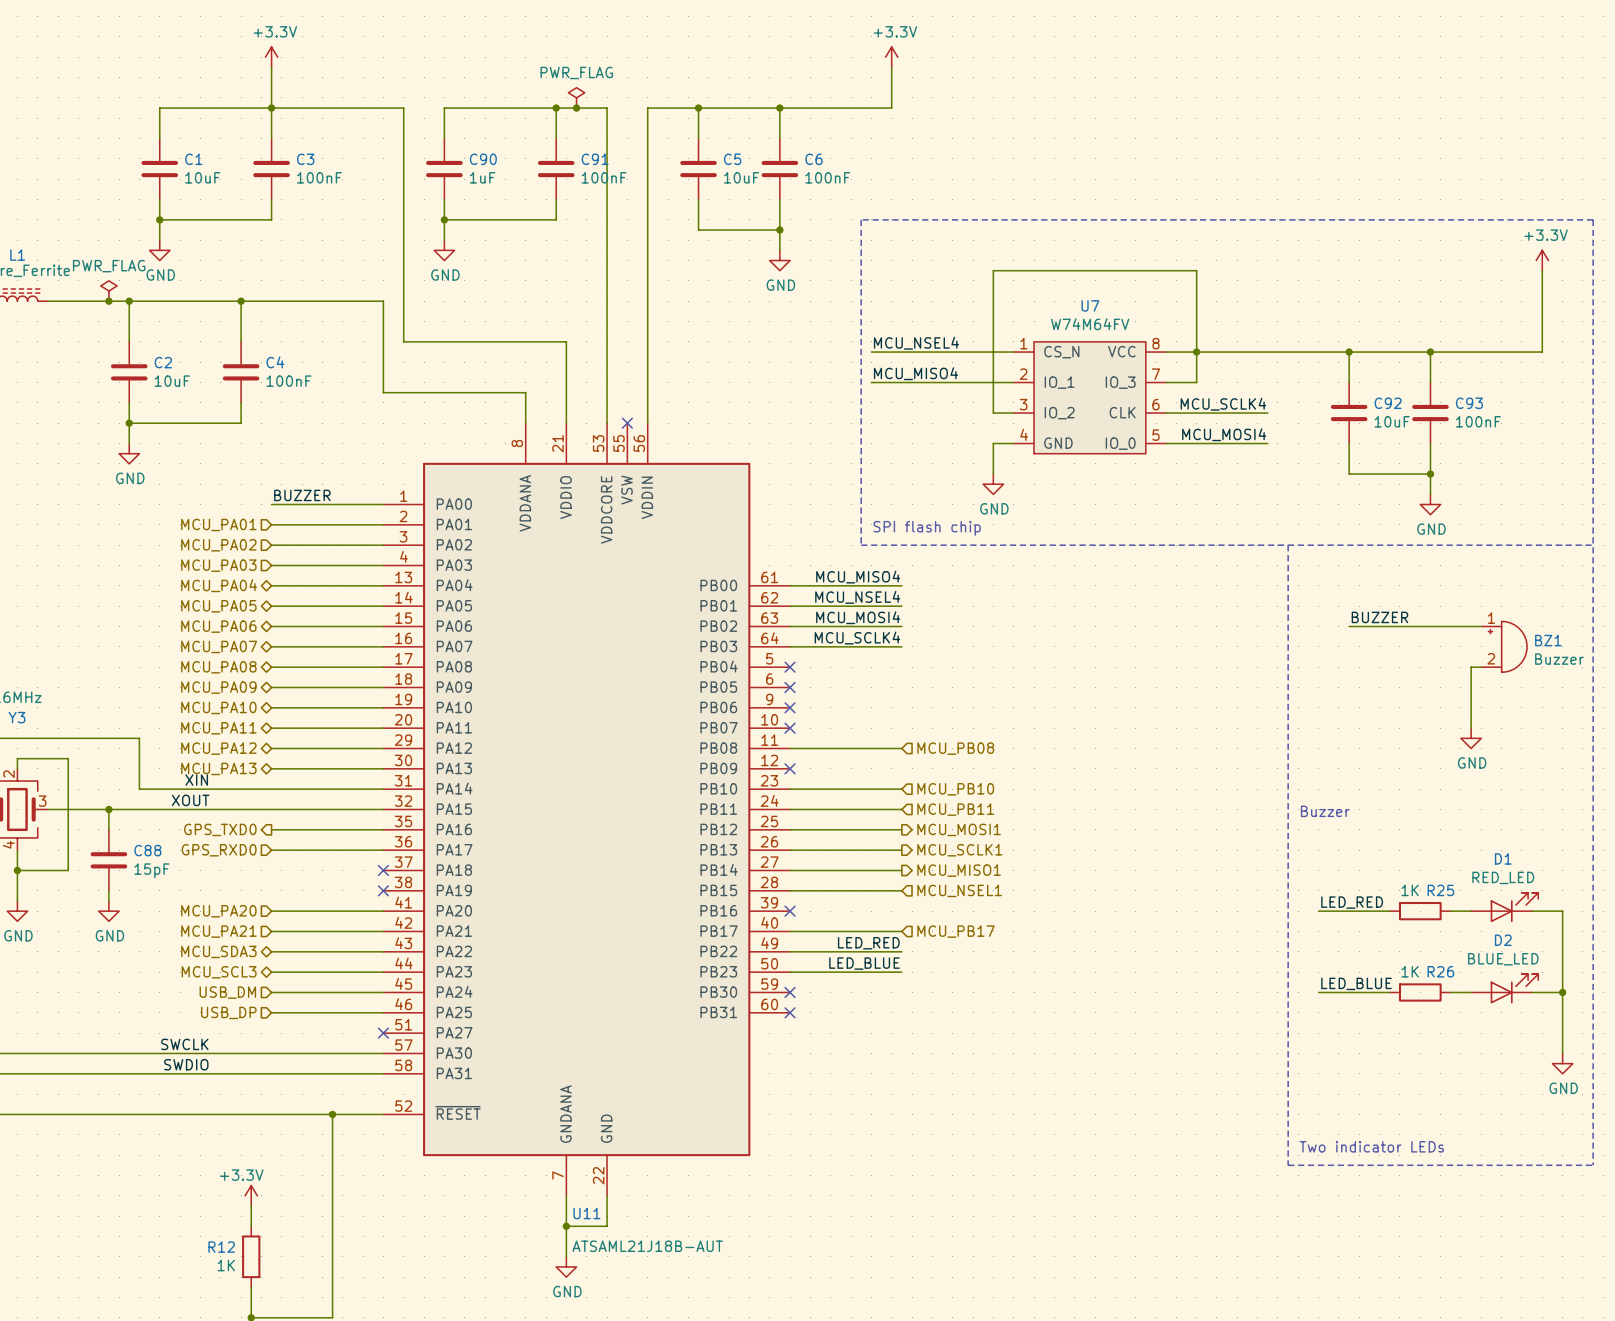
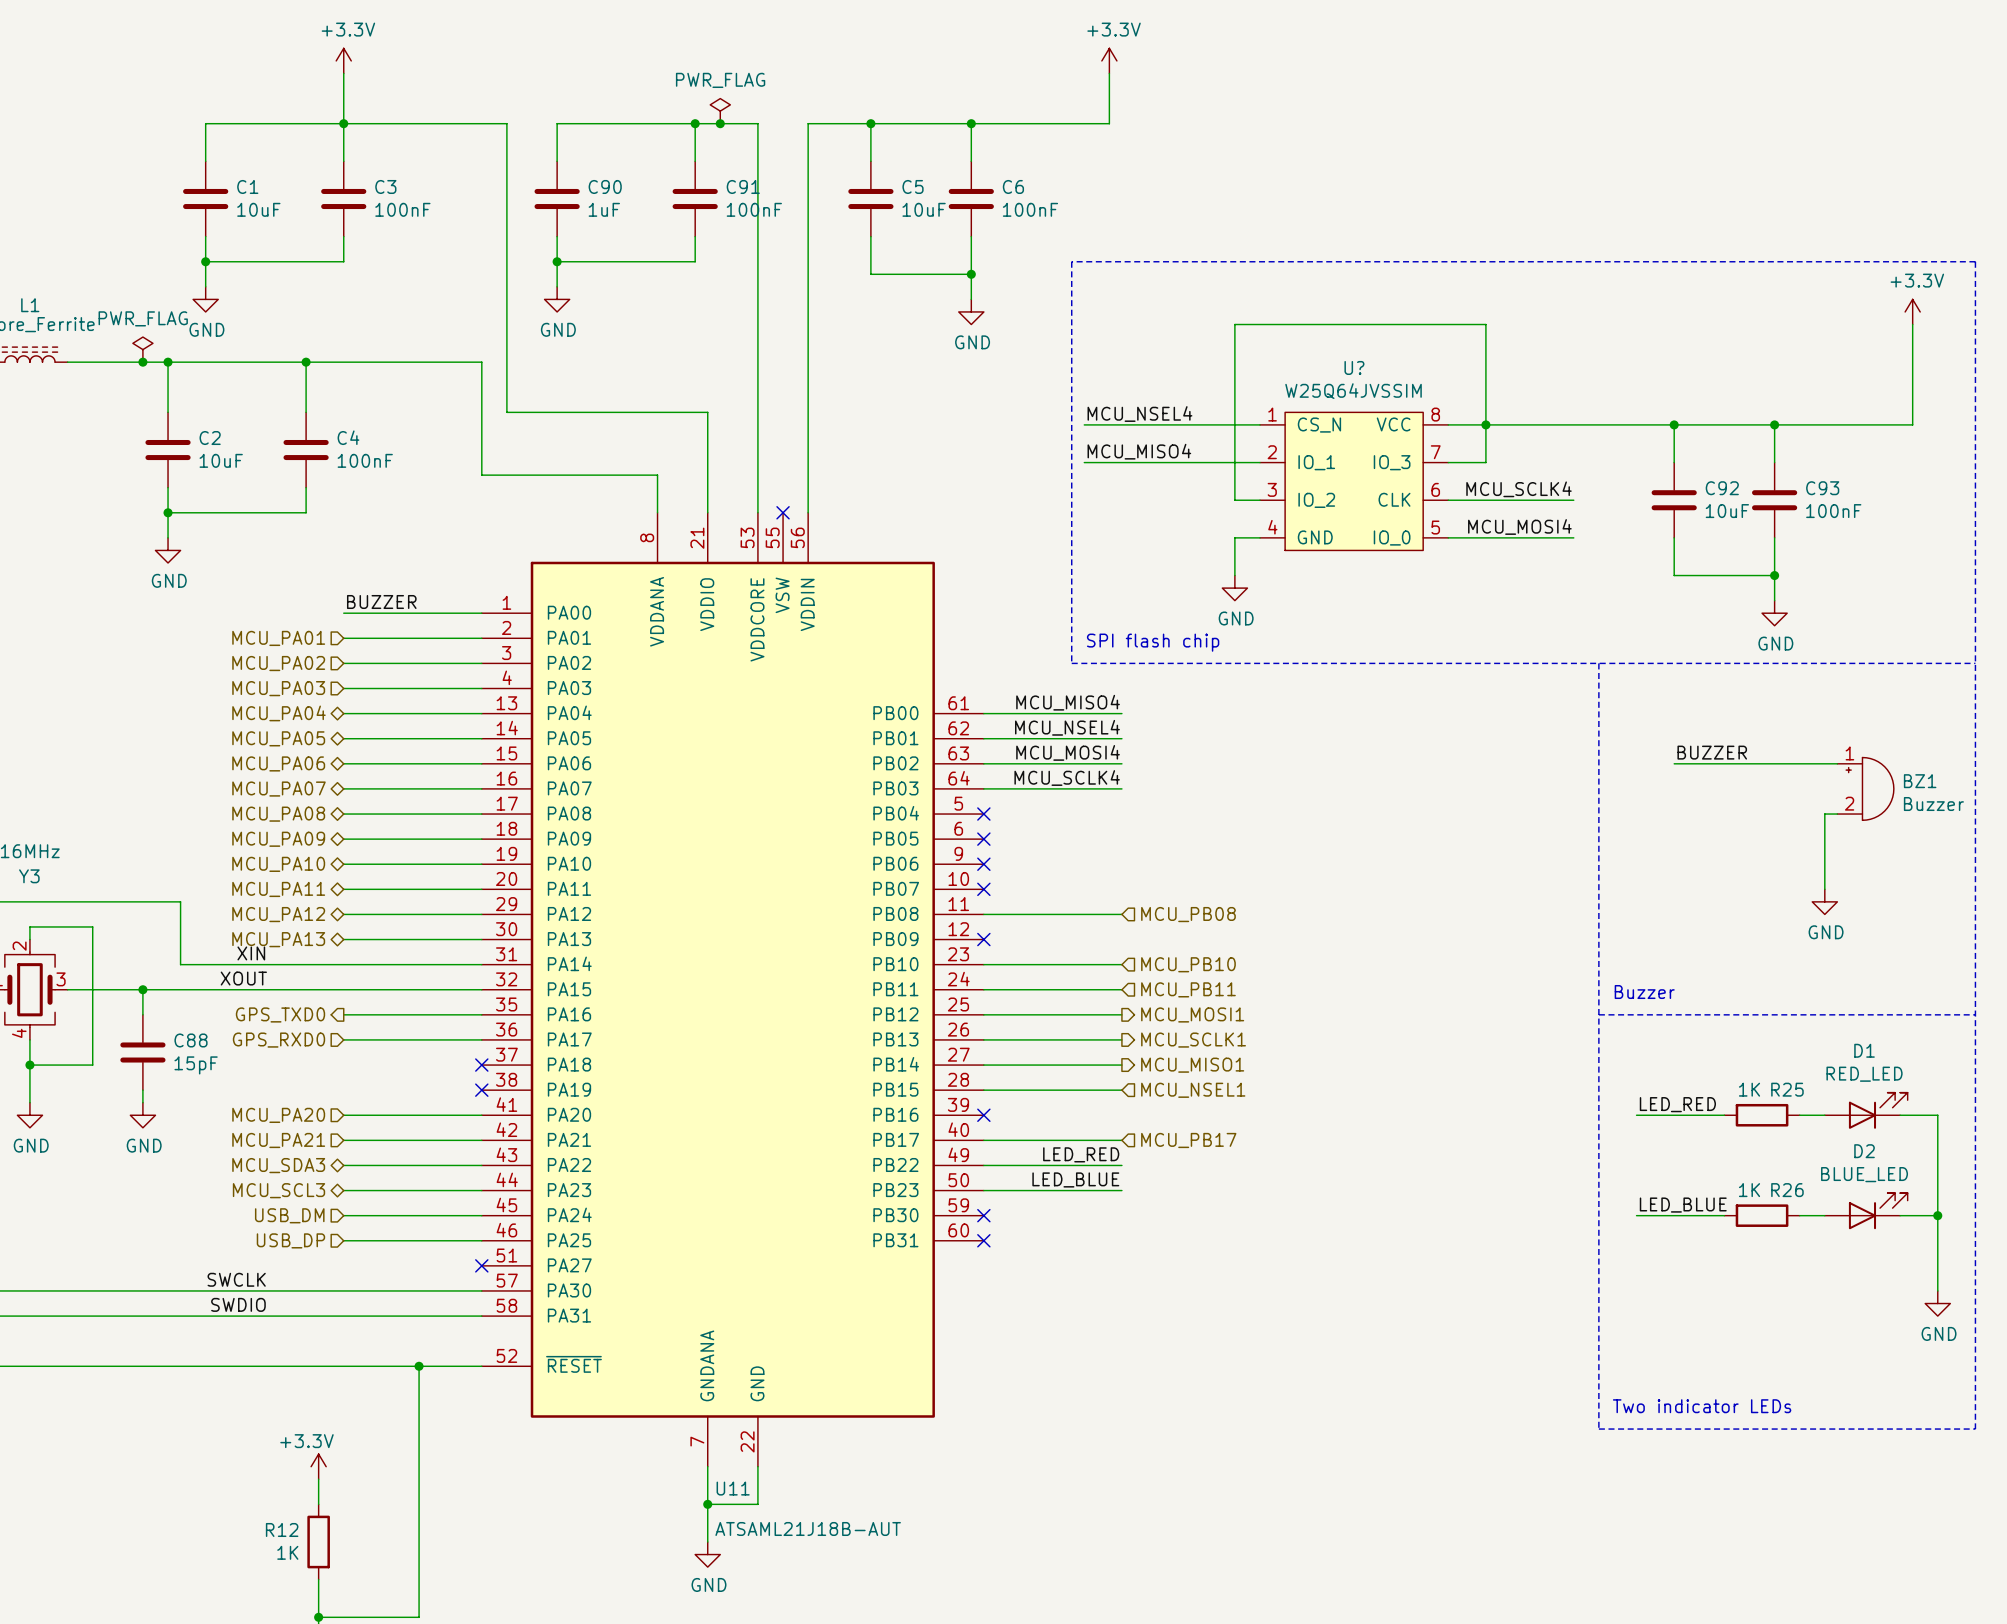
U7 name: U7 (1090, 305) -> U? (1354, 367)
U7 value: W74M64FV (1090, 324) -> W25Q64JVSSIM (1353, 391)
line: none -> (1598, 1014) (1975, 1014)

